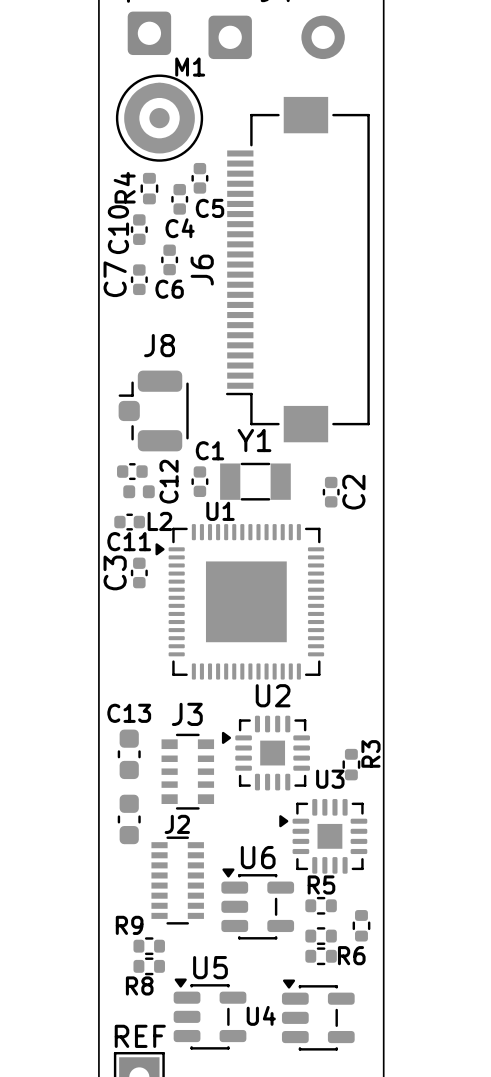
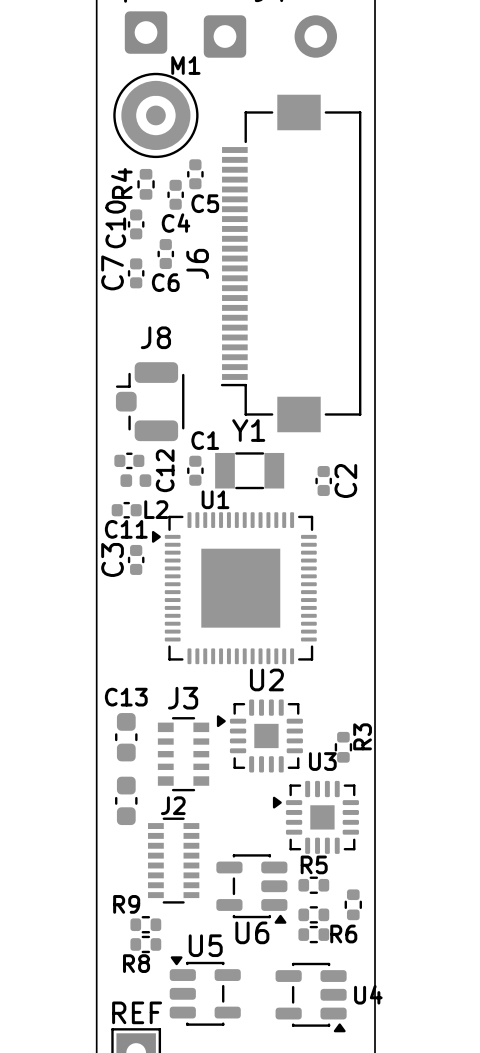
U6 rotation: 0° (257, 903) -> 180° (251, 889)
U4 rotation: 0° (318, 1015) -> 180° (311, 997)

